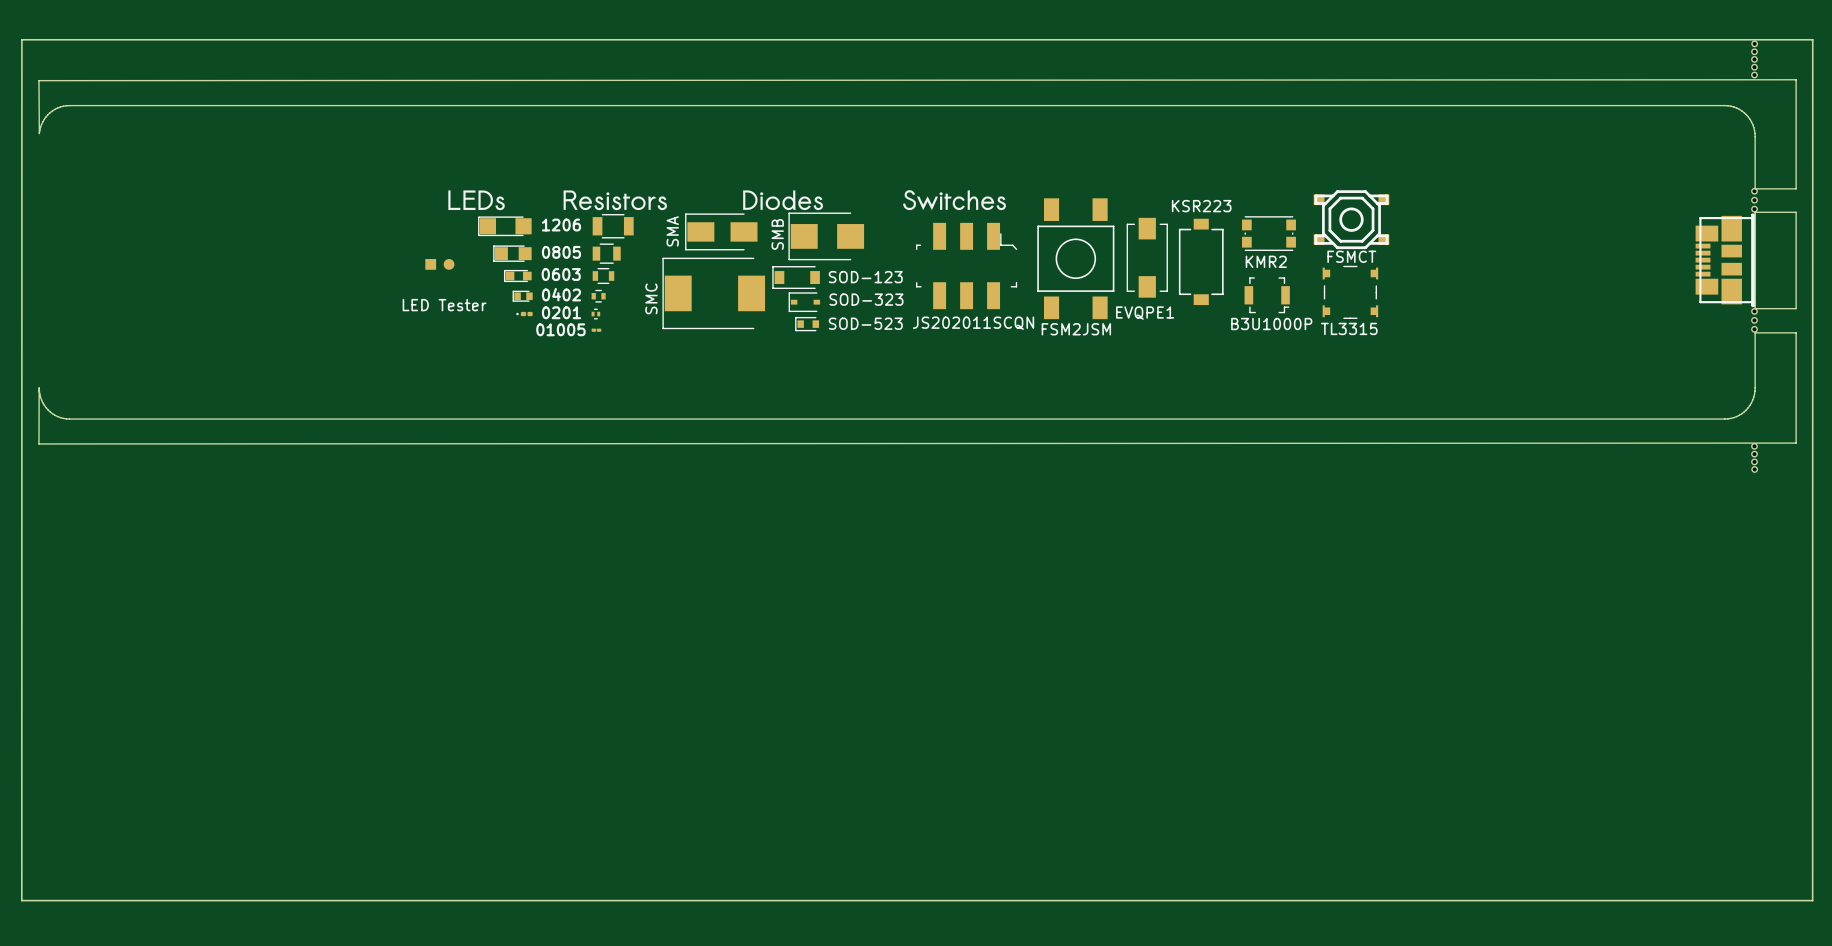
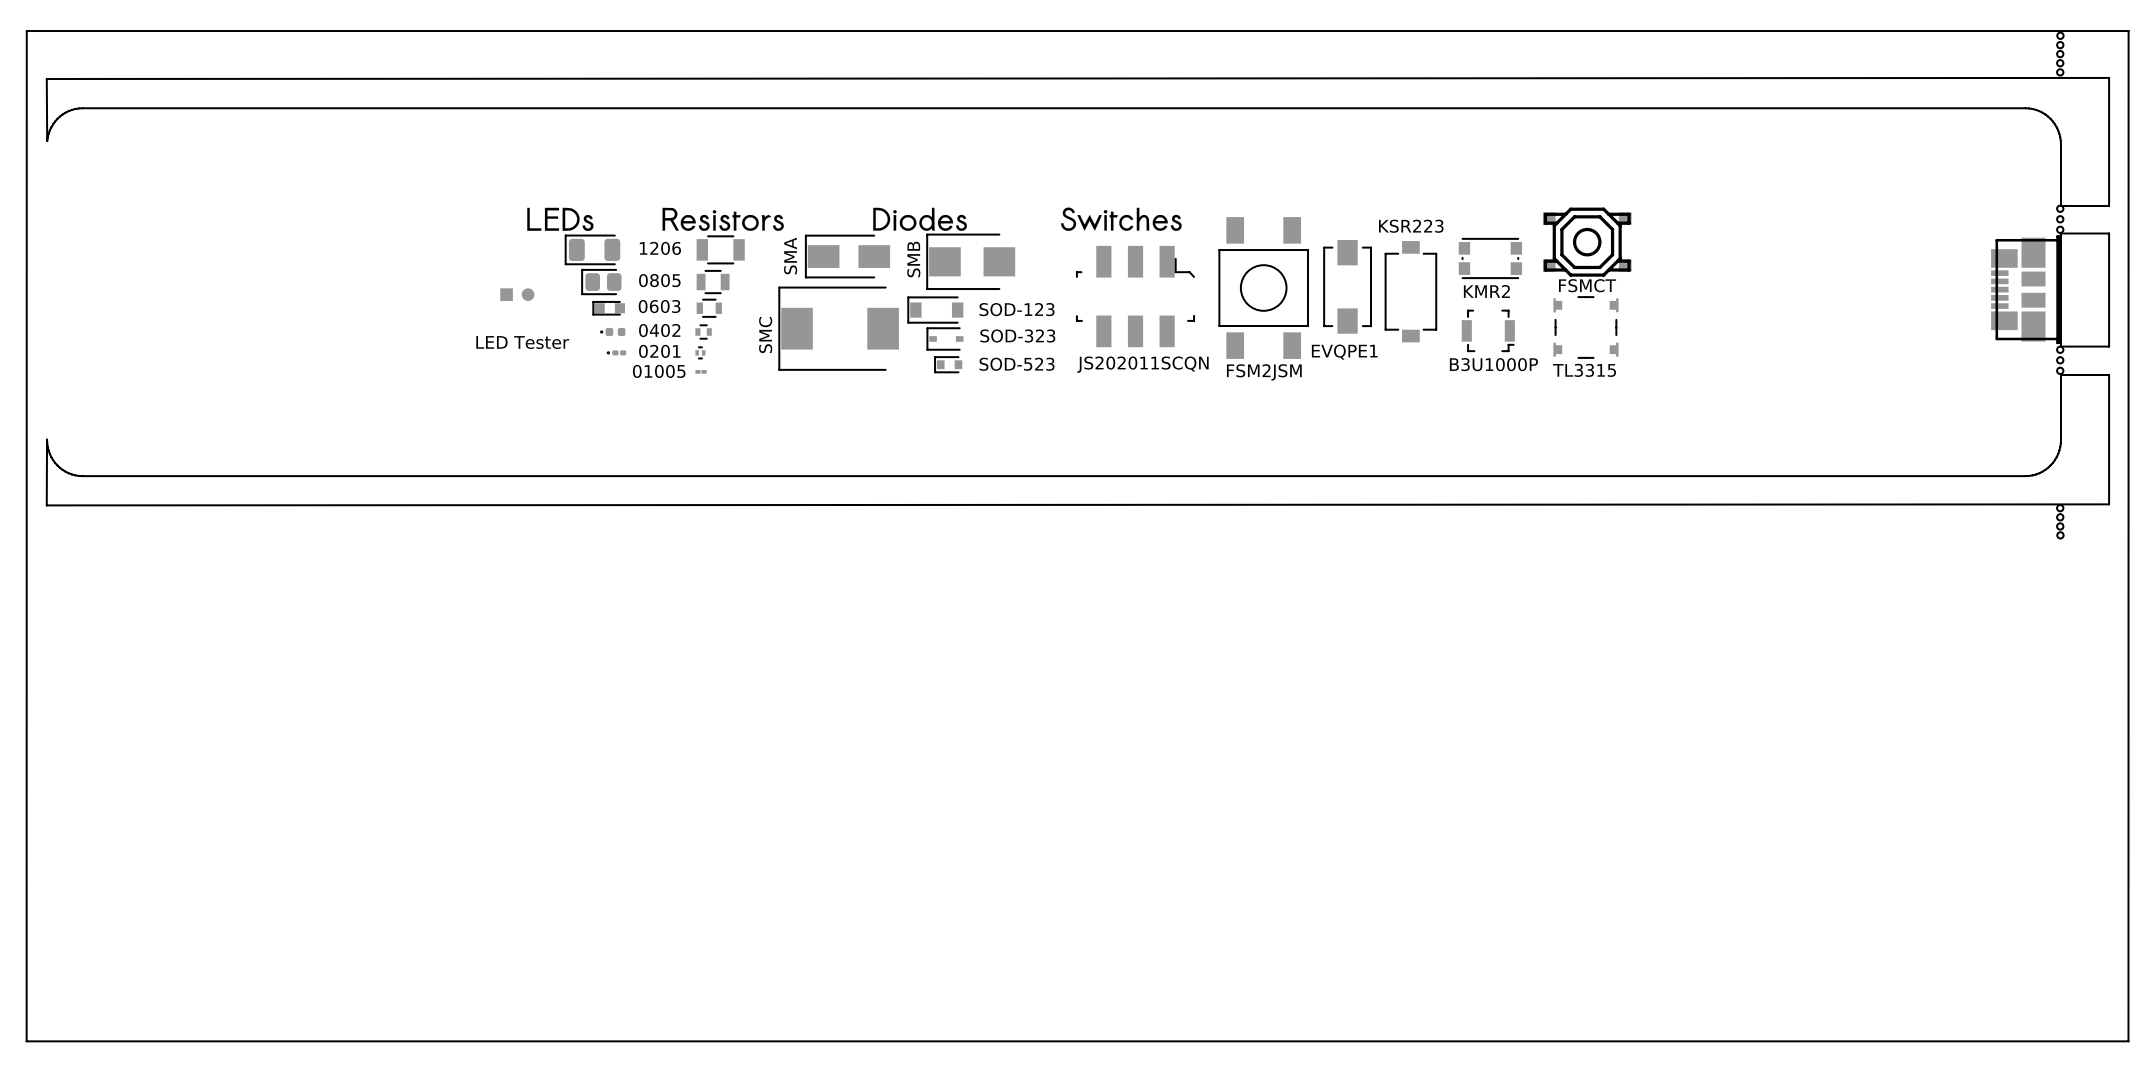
part footprint: [478, 216, 532, 237] -> [564, 234, 621, 266]
part footprint: [493, 245, 532, 262] -> [581, 269, 622, 295]
part footprint: [512, 290, 533, 302] -> [600, 327, 626, 337]

